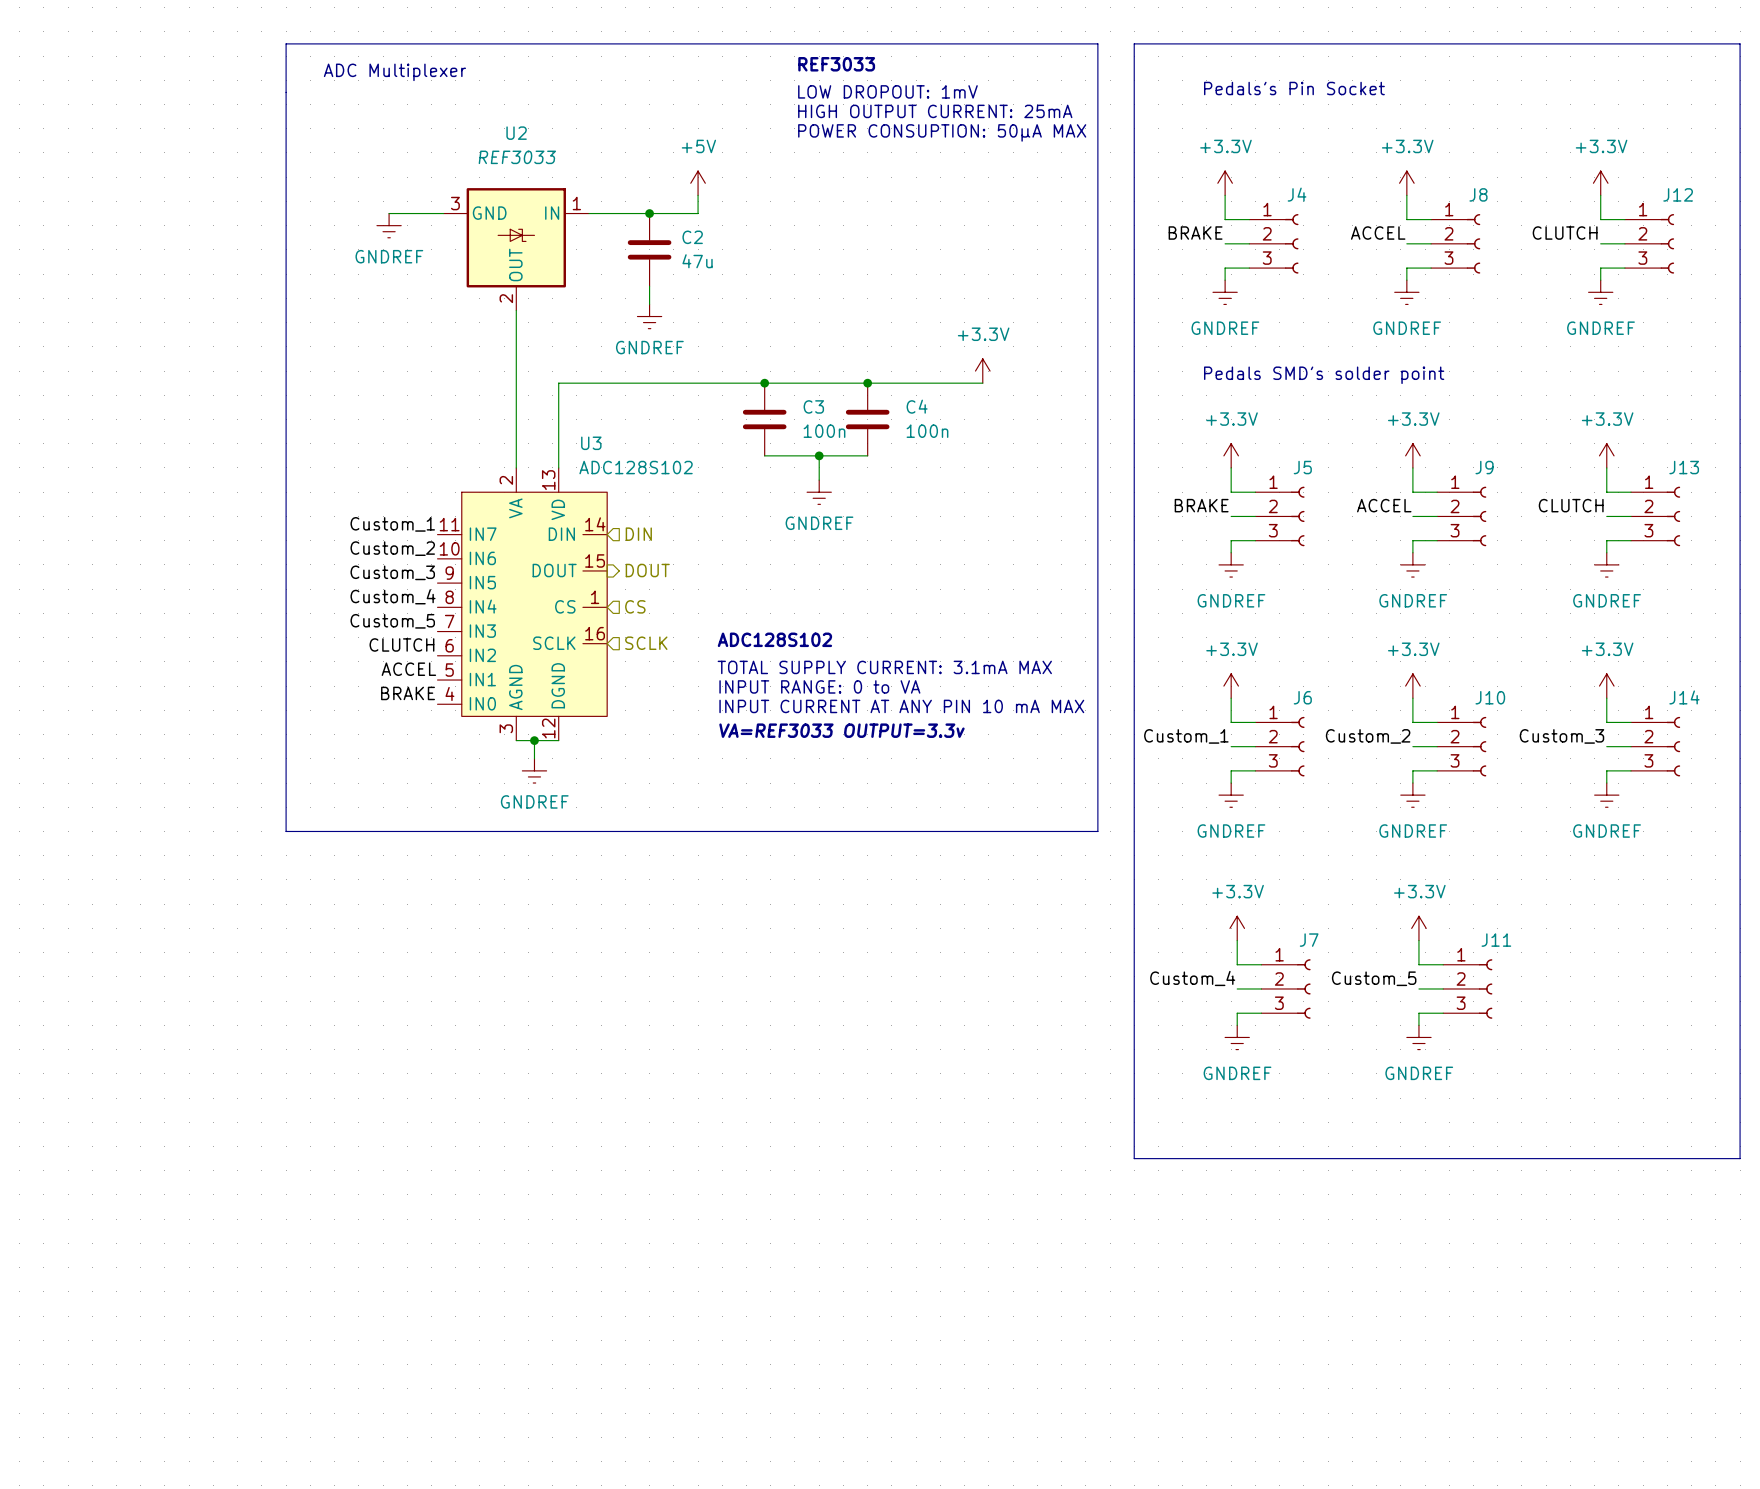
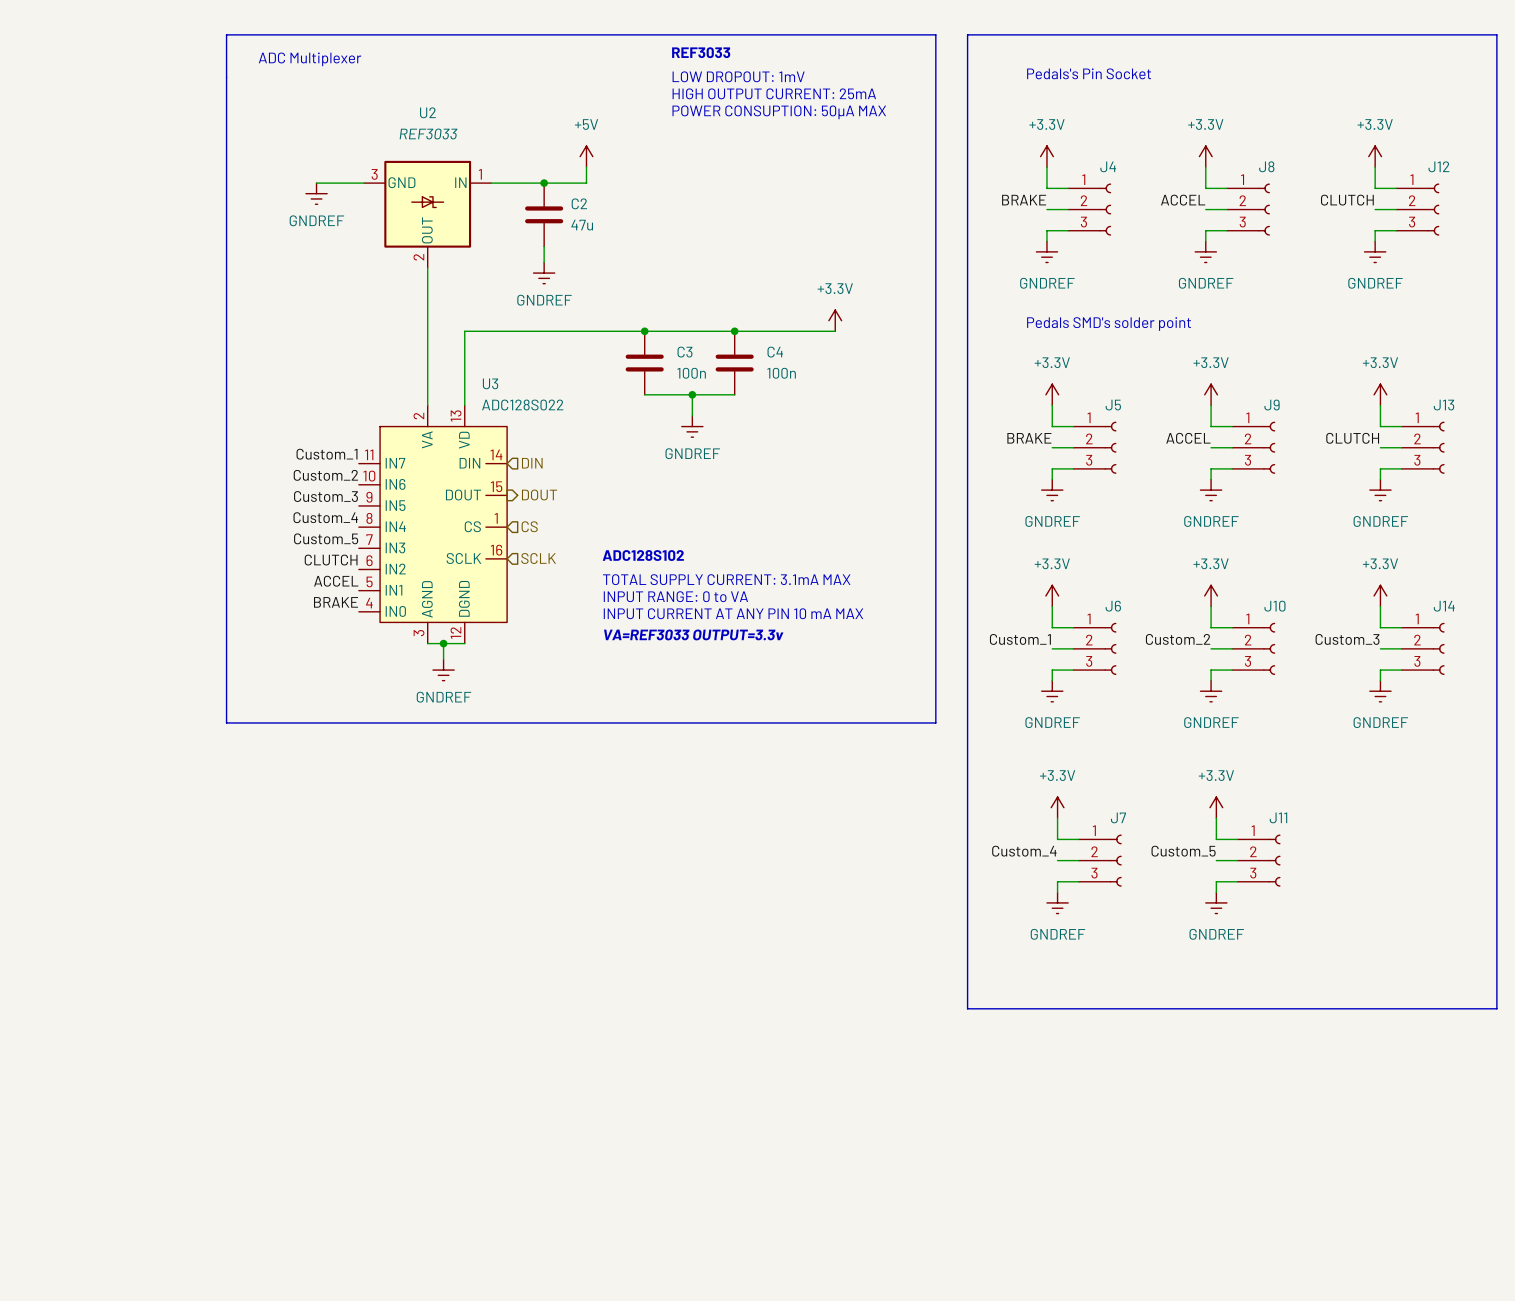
U3 value: ADC128S102 (636, 467) -> ADC128S022 (522, 405)

